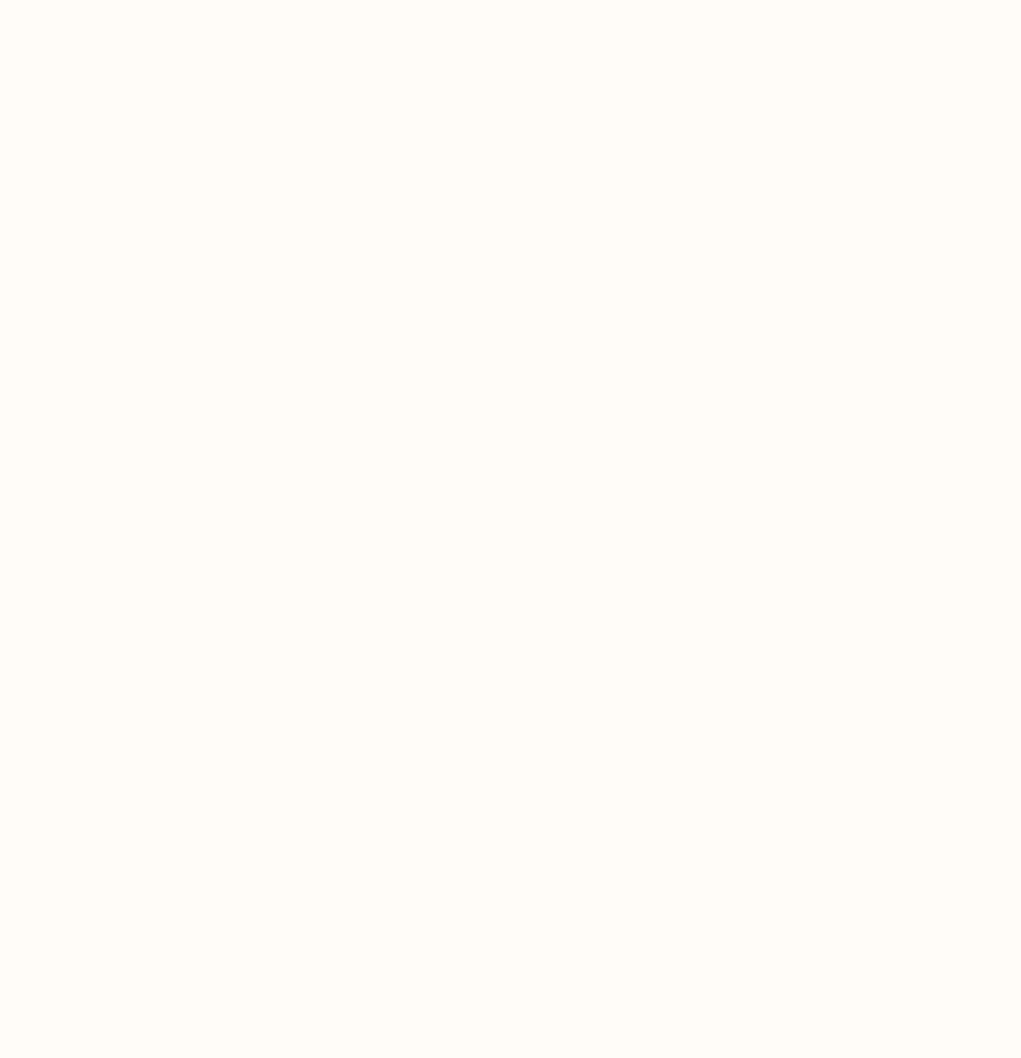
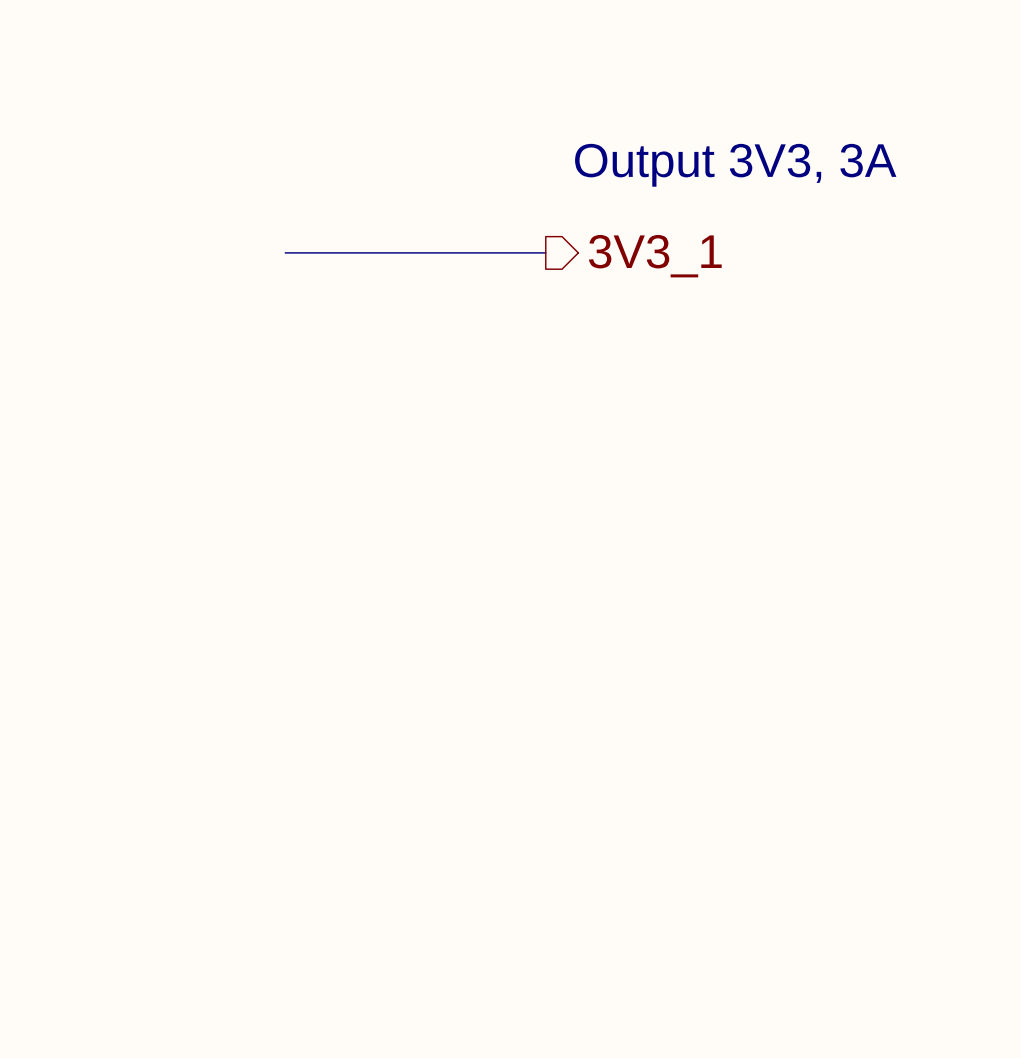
text: none -> Output 3V3, 3A (735, 165)
wire: none -> (285, 252) (545, 252)
hierarchical label: none -> 3V3_1 (655, 256)

